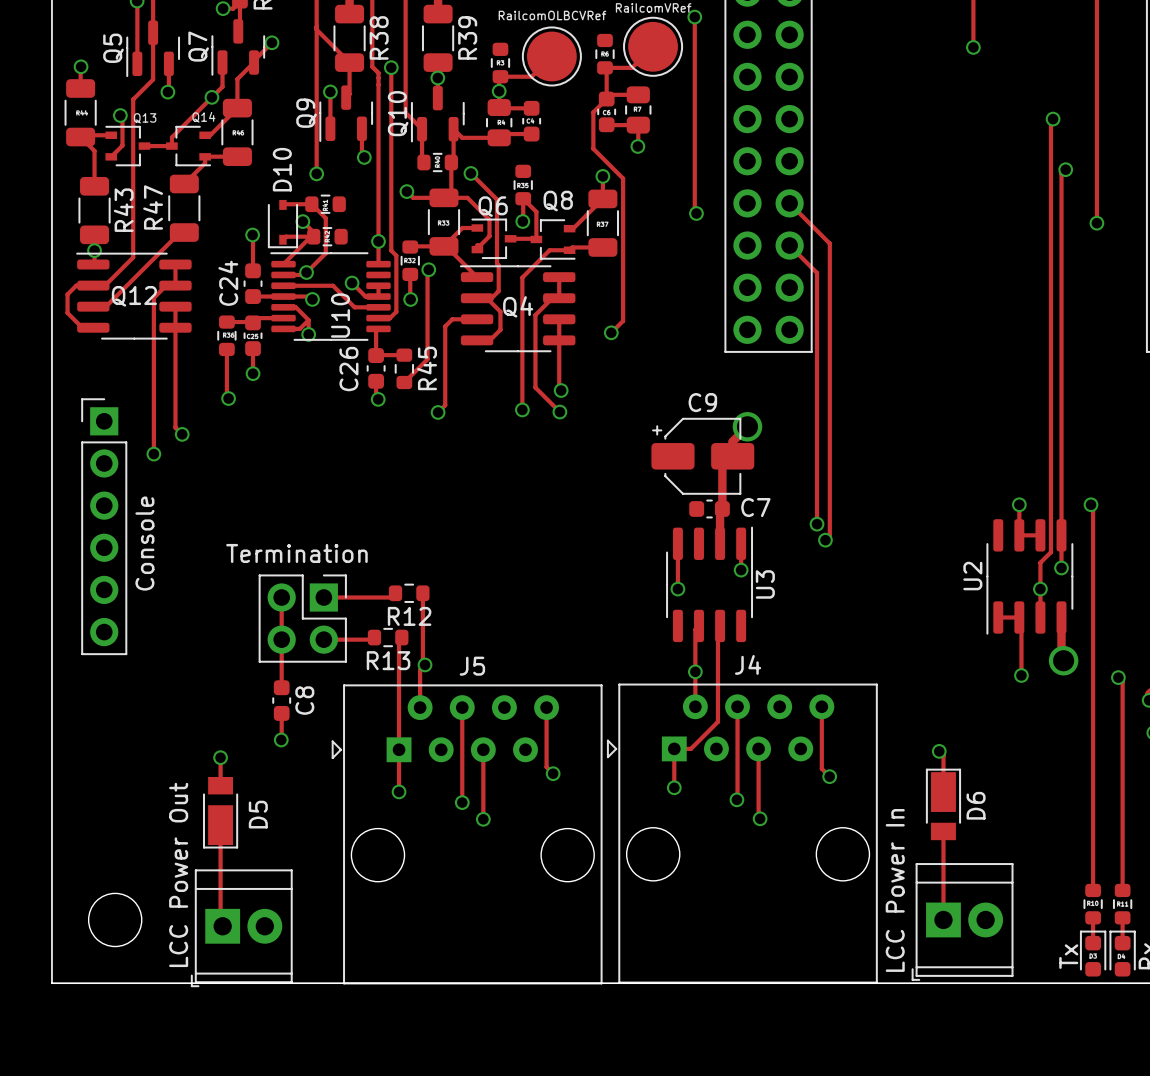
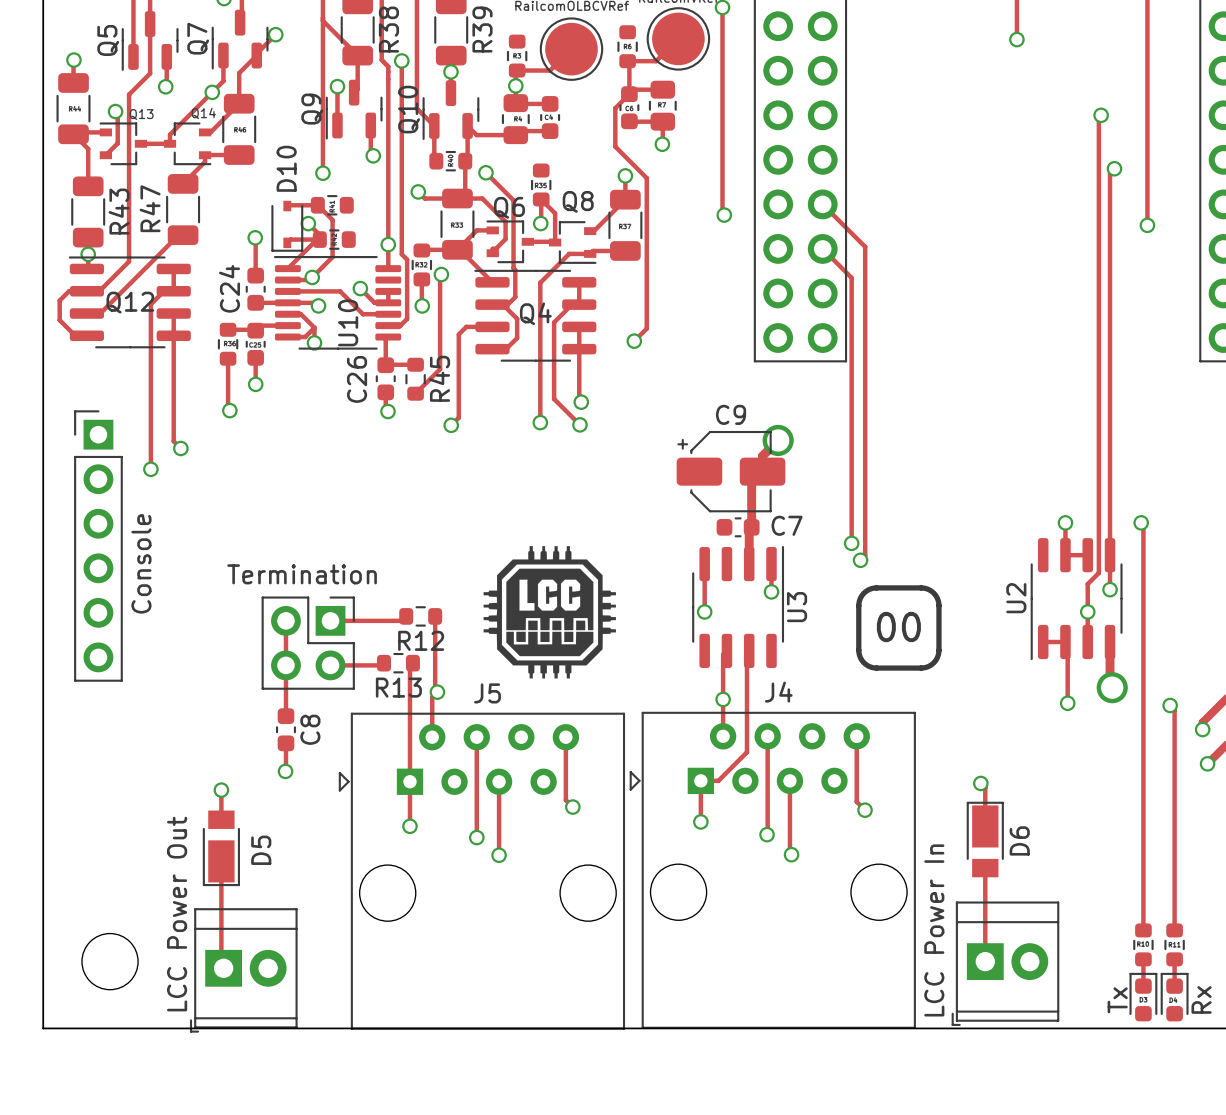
drawing: none -> [483, 546, 616, 679]
drawing: none -> [856, 585, 942, 671]

